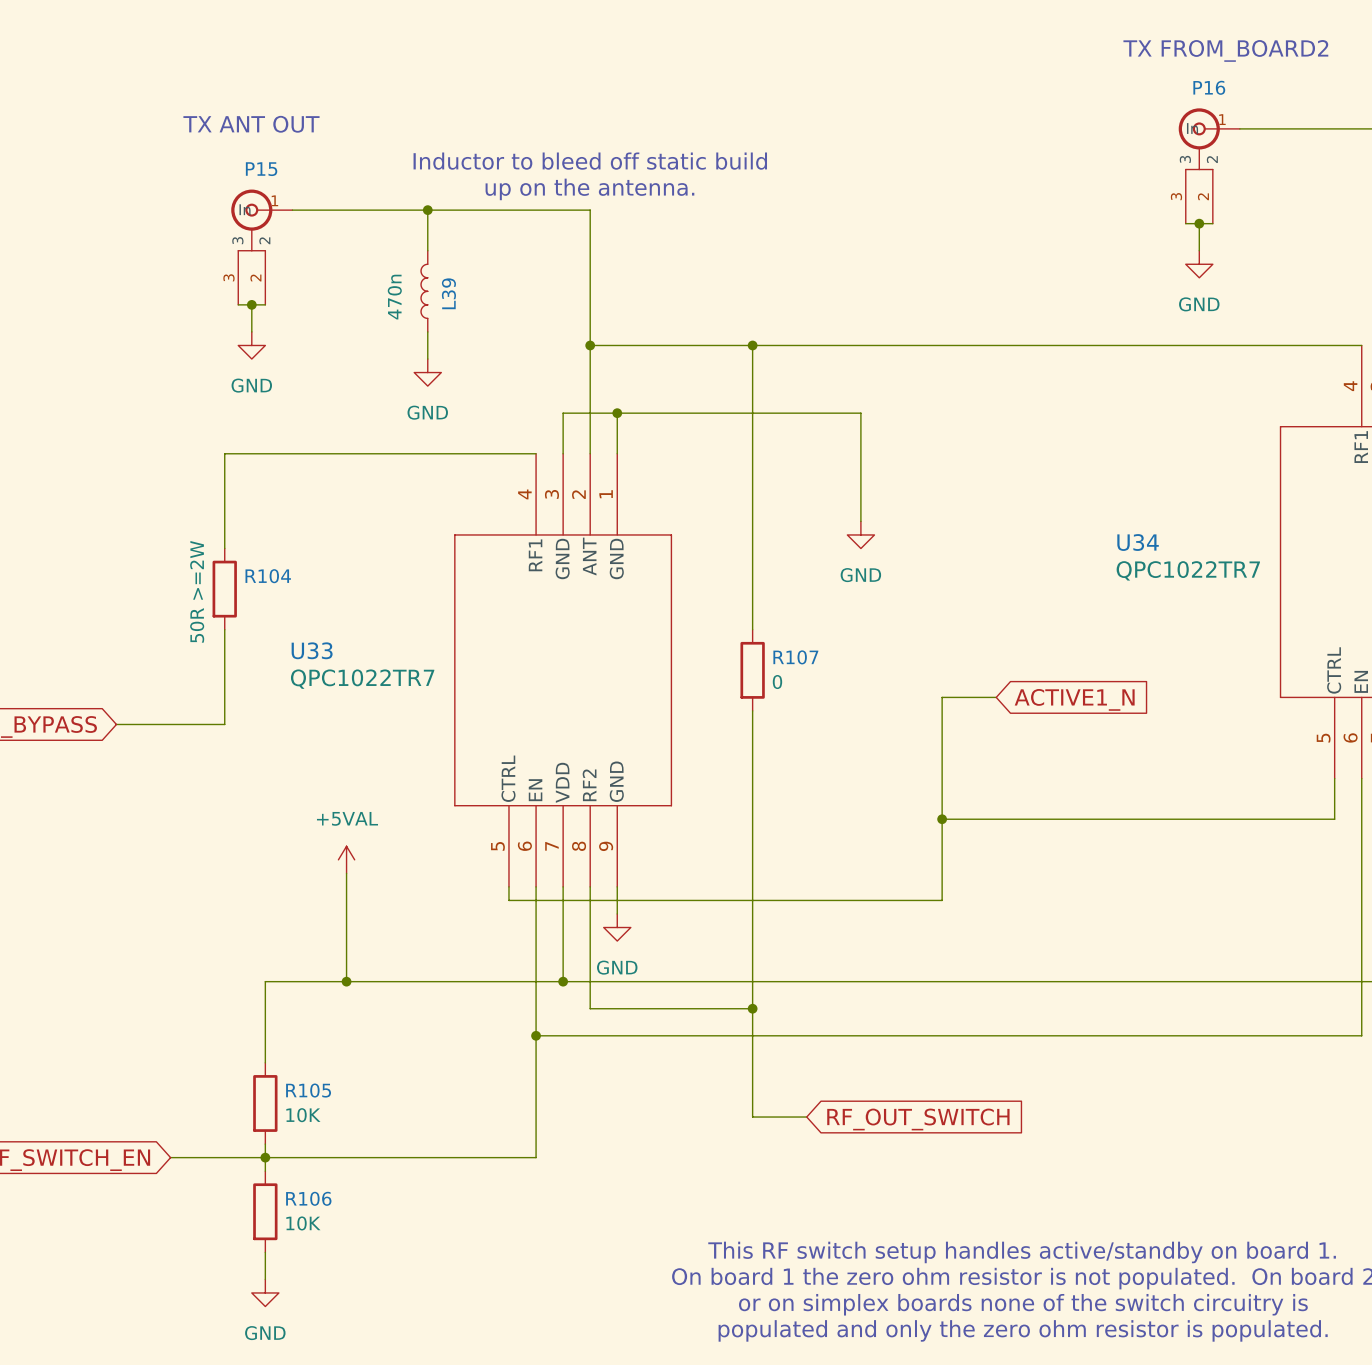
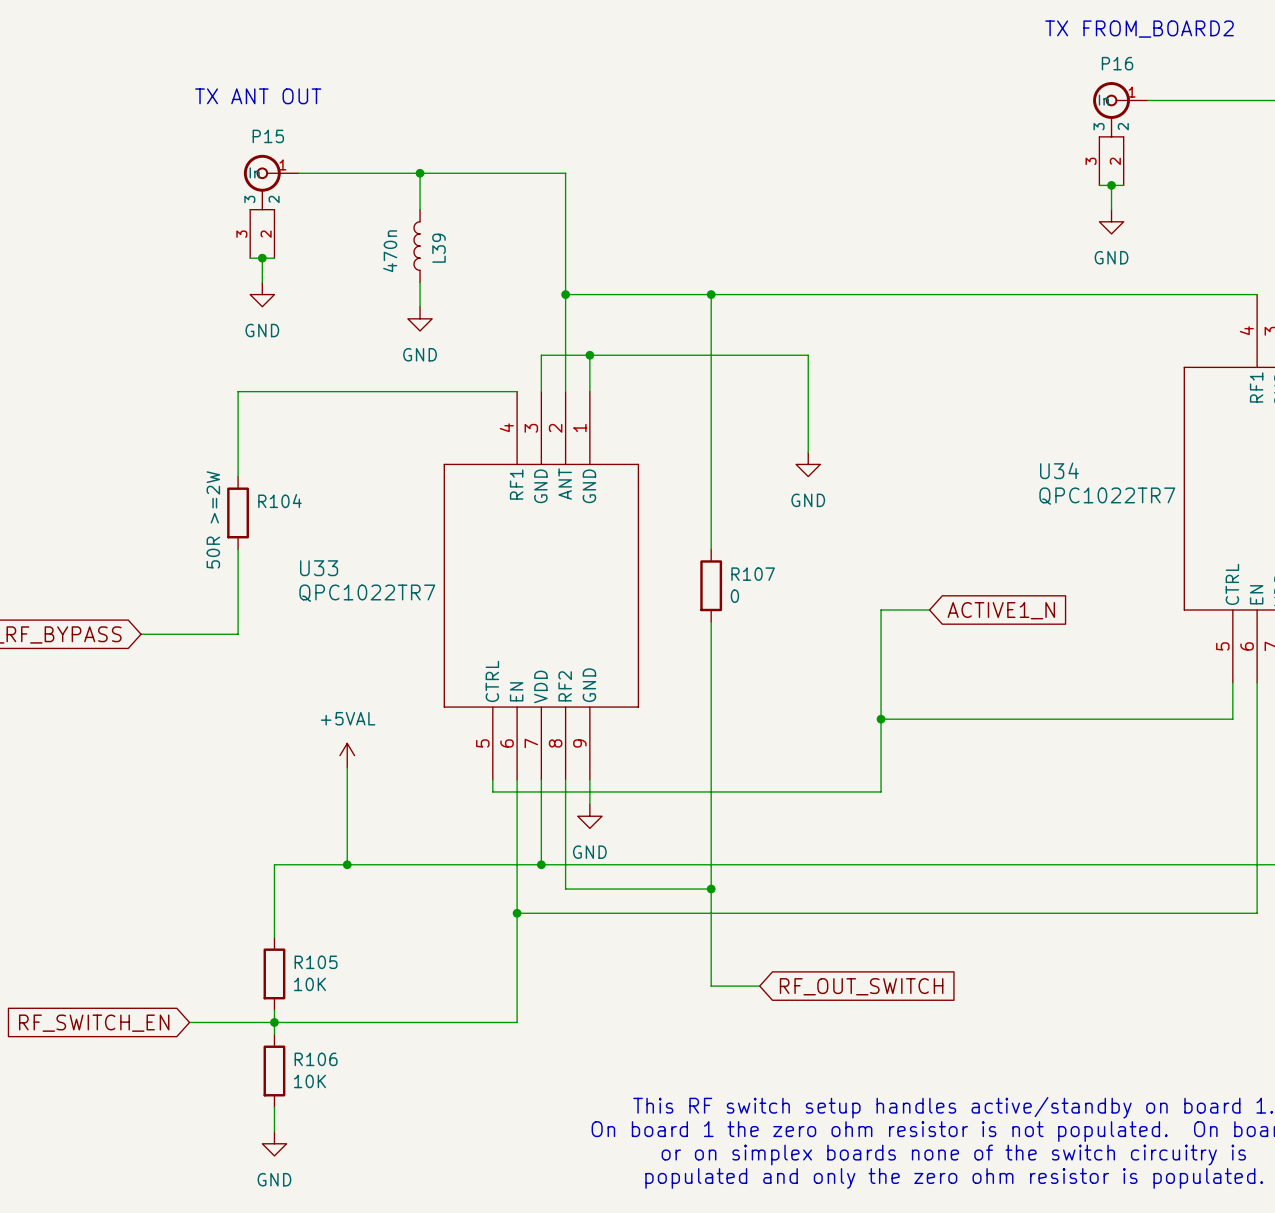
text: Inductor to bleed off static build (590, 161) -> none
text: up on the antenna. (589, 189) -> none

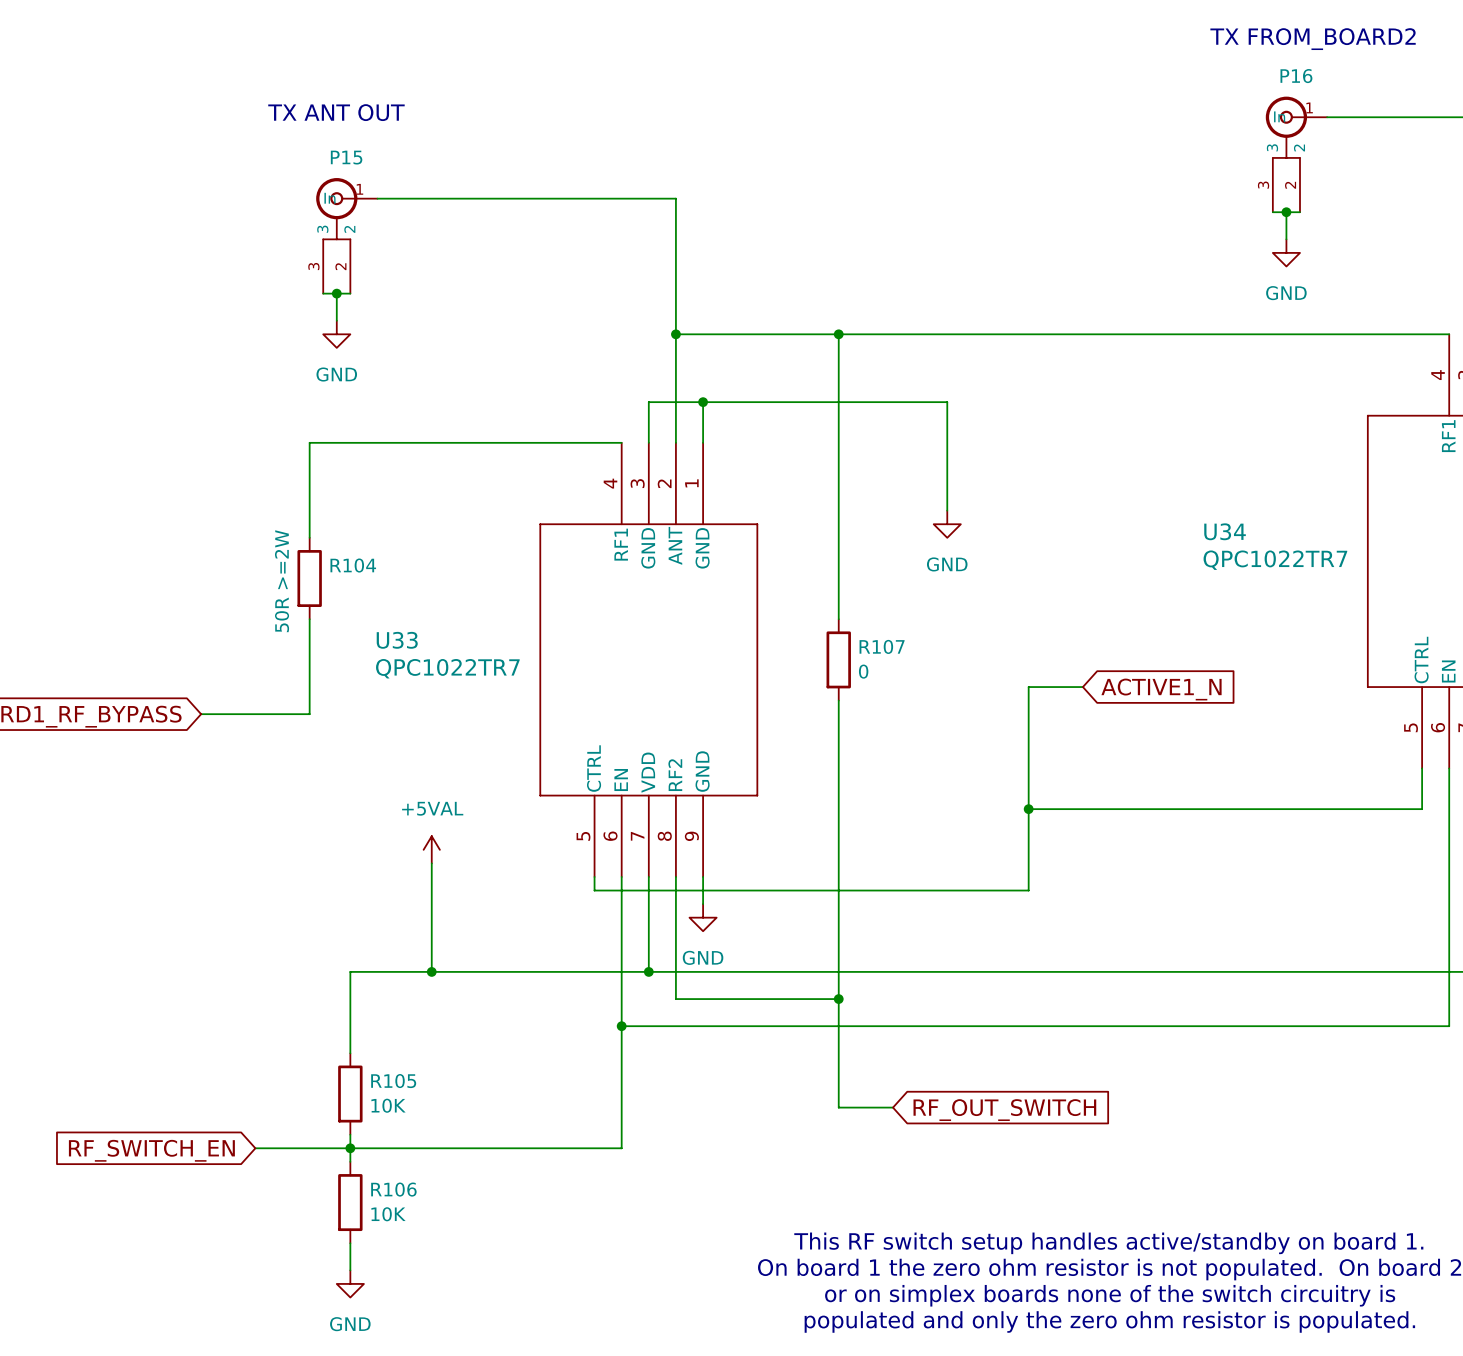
wire: (420, 173) (420, 209) -> none
junction: (420, 173) -> none
L39: 470n (417, 246) -> none
wire: (420, 282) (420, 306) -> none
power symbol: GND (420, 318) -> none

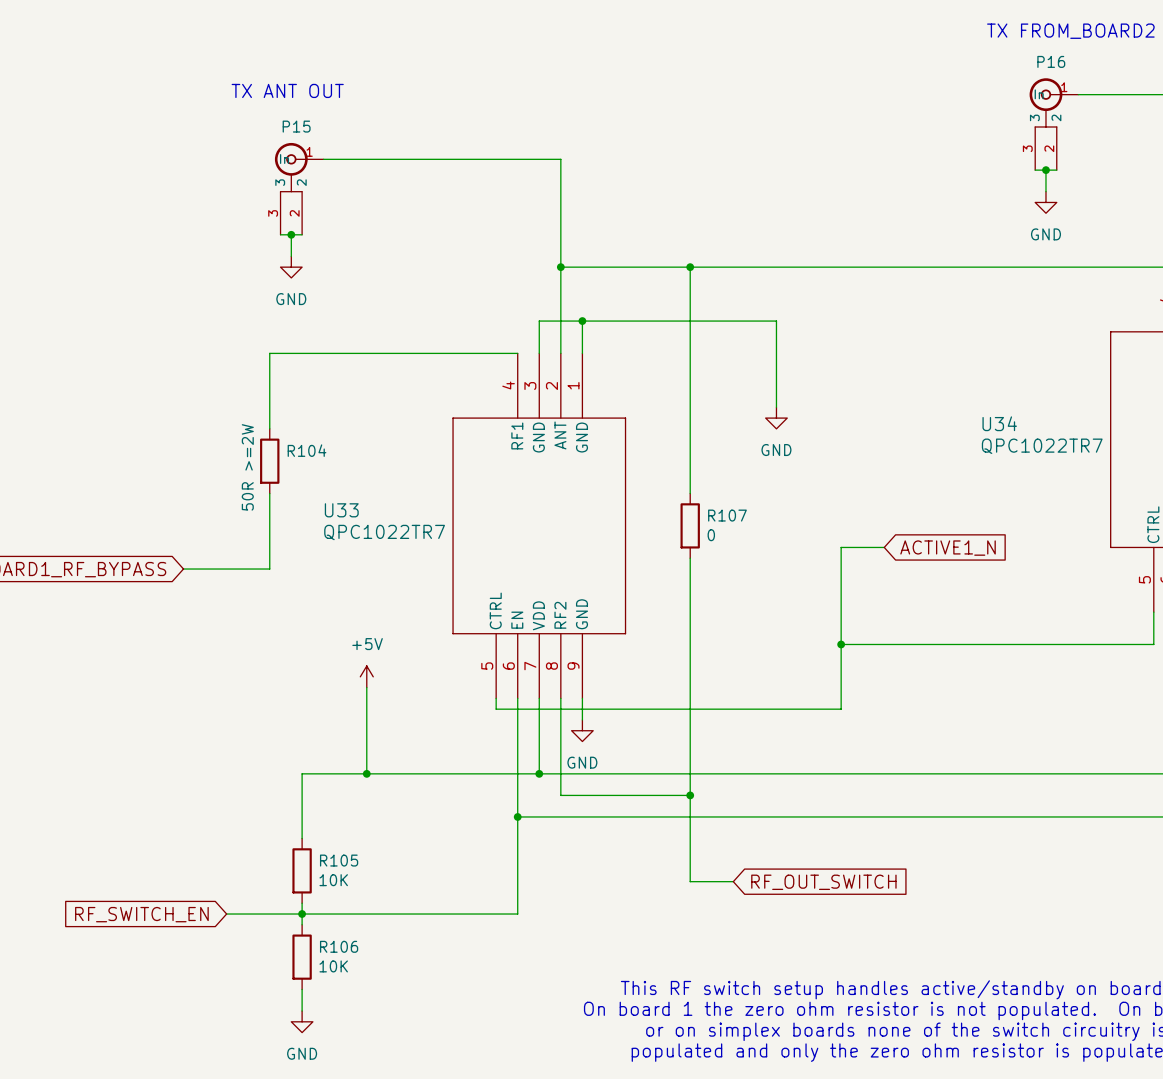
power symbol: +5VAL (431, 849) -> +5V (366, 676)

